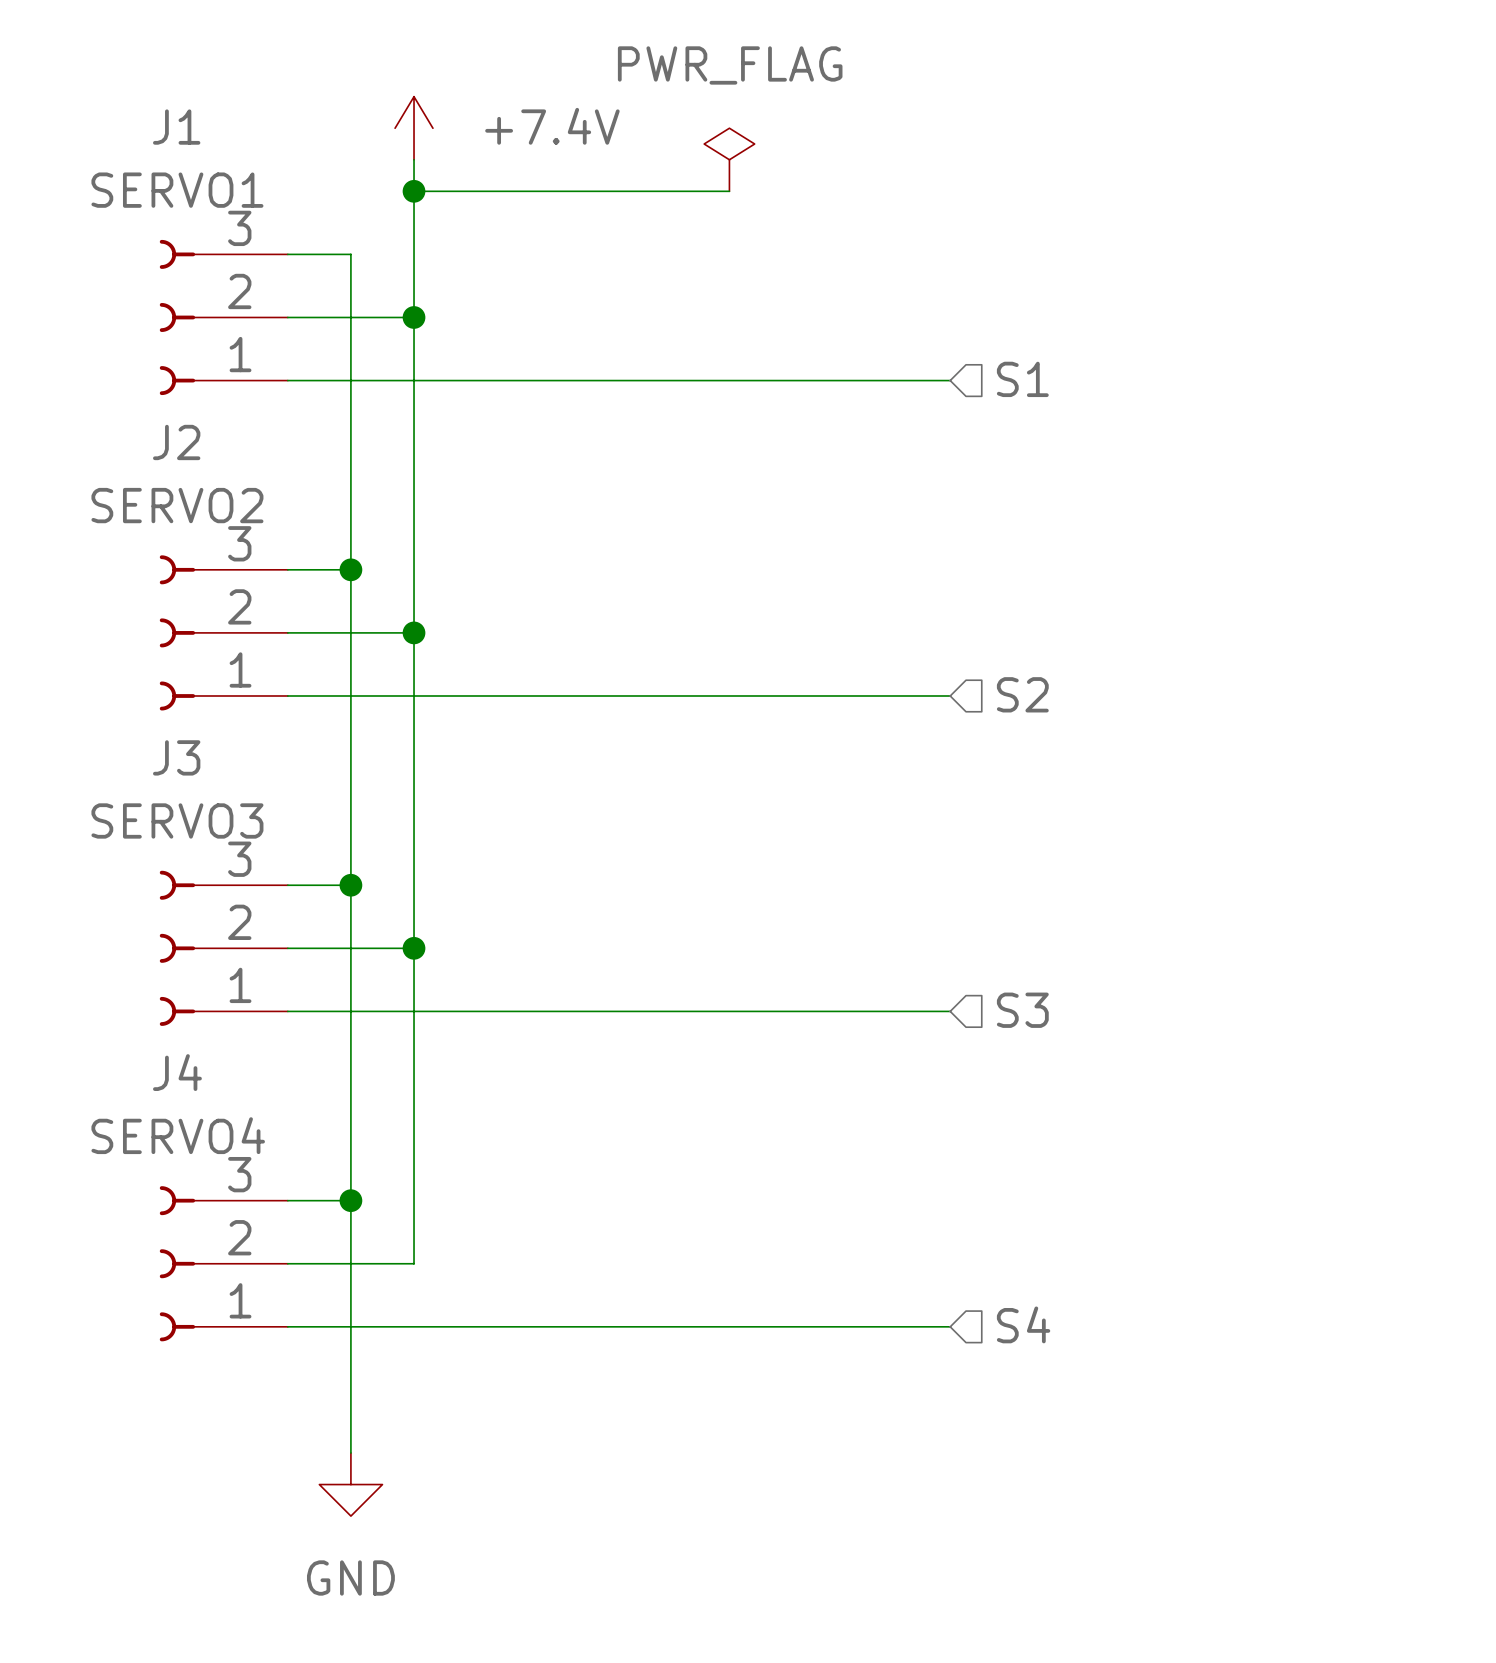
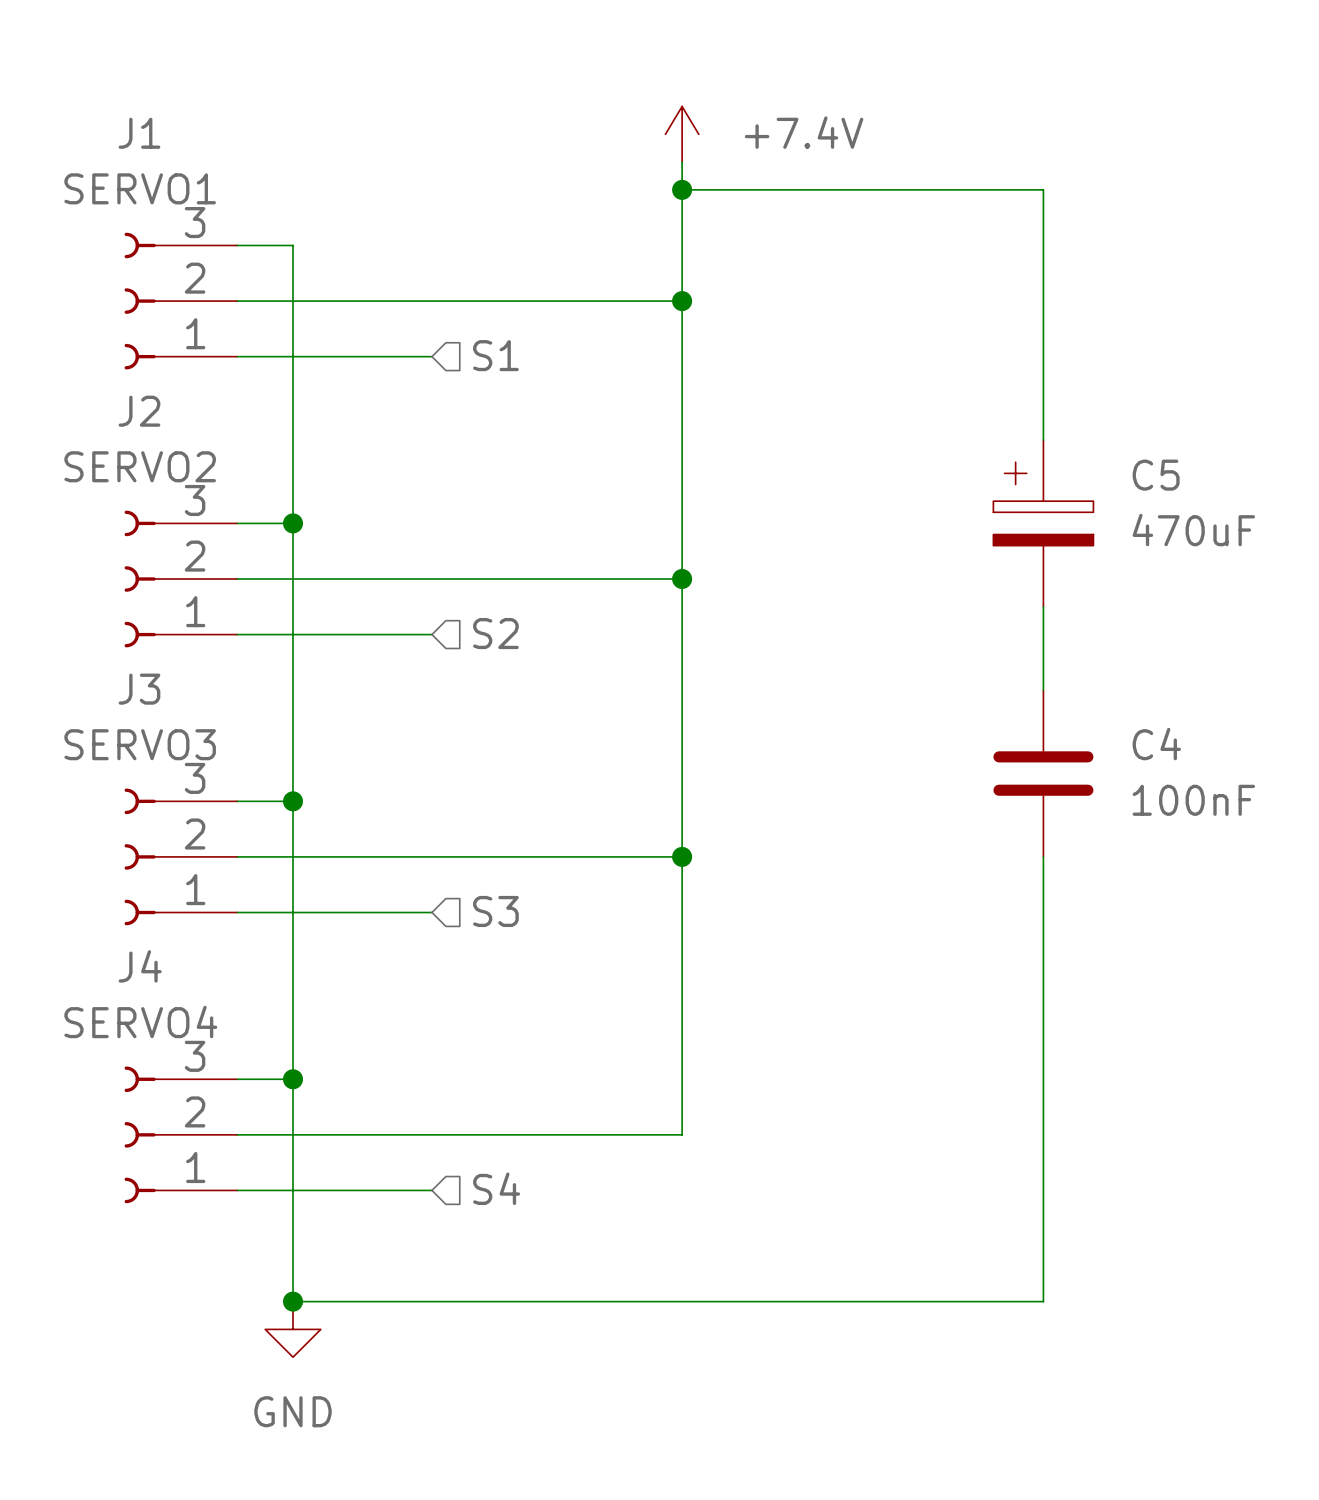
power symbol position: +7.4V (414, 128) -> +7.4V (682, 134)
wire: (414, 159) (414, 1263) -> (682, 162) (682, 1134) (348, 1134)
power symbol: PWR_FLAG (729, 159) -> none
wire: (414, 191) (729, 191) -> none
junction: (414, 191) -> none
wire: none -> (682, 189) (1043, 189) (1043, 440)
junction: none -> (682, 189)
wire: none -> (348, 301) (682, 301)
junction: (414, 317) -> none
junction: none -> (682, 301)
hierarchical label position: S1 (1022, 379) -> S1 (495, 355)
wire: (508, 380) (950, 380) -> none
C5: none -> 470uF (1043, 523)
wire: none -> (348, 579) (682, 579)
junction: (414, 632) -> none
junction: none -> (682, 579)
wire: none -> (1043, 606) (1043, 690)
hierarchical label position: S2 (1022, 694) -> S2 (495, 633)
wire: (508, 695) (950, 695) -> none
C4: none -> 100nF (1043, 773)
wire: none -> (348, 856) (682, 856)
junction: (414, 948) -> none
junction: none -> (682, 856)
wire: none -> (1043, 856) (1043, 1301) (293, 1301)
hierarchical label position: S3 (1022, 1010) -> S3 (495, 911)
wire: (508, 1011) (950, 1011) -> none
hierarchical label position: S4 (1023, 1324) -> S4 (496, 1188)
wire: (508, 1326) (950, 1326) -> none
junction: none -> (293, 1301)

